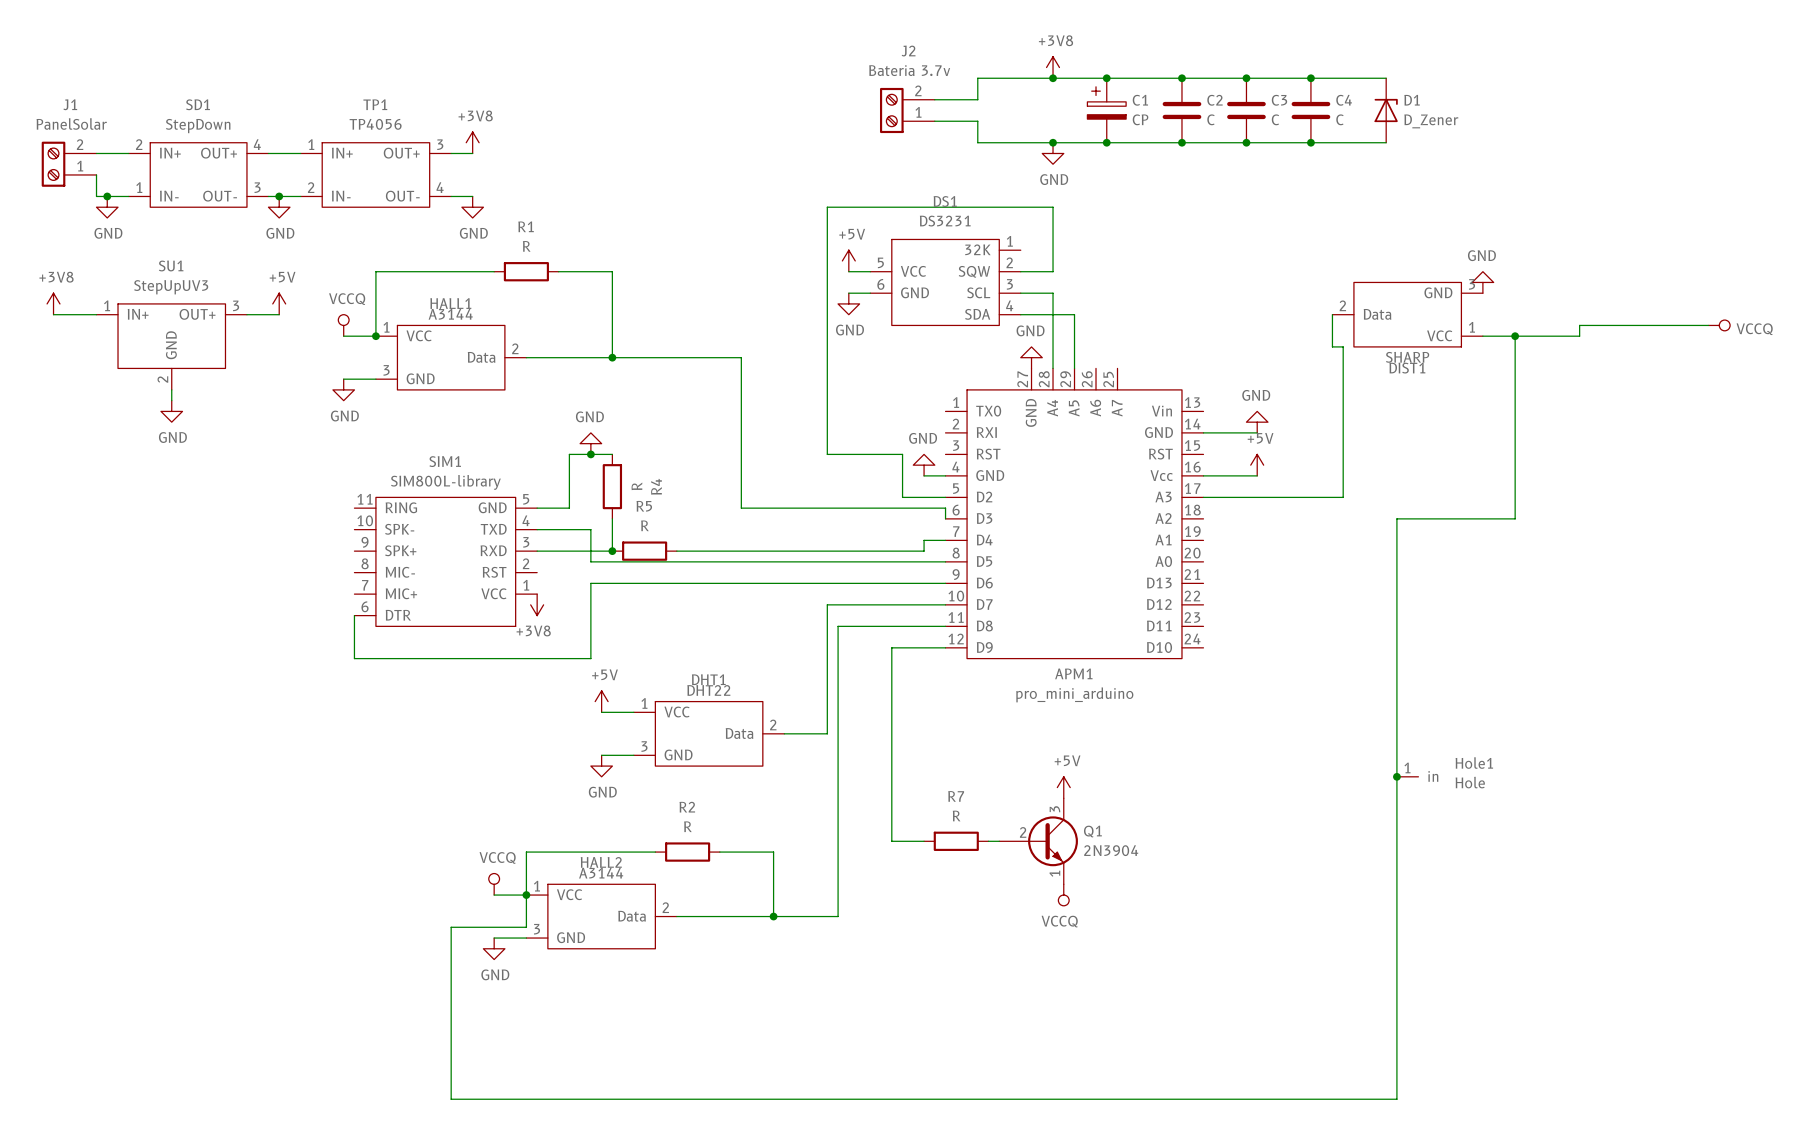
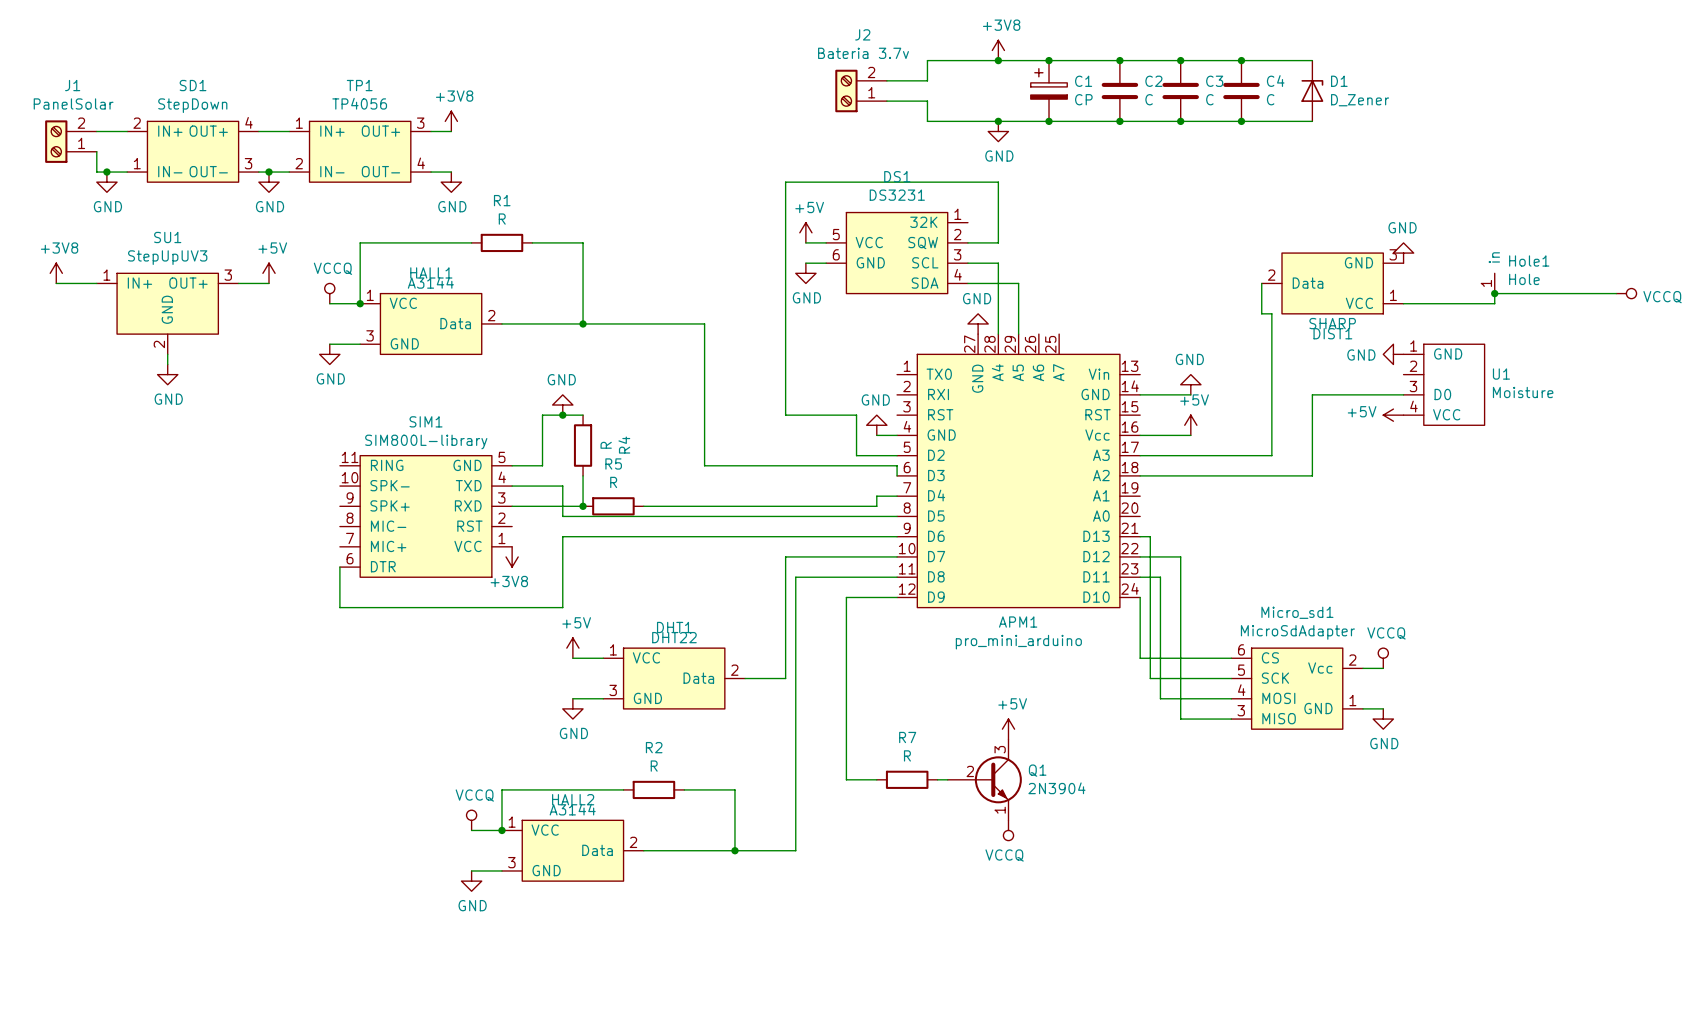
junction: none -> (1494, 293)
wire: (1515, 336) (1515, 518) (1396, 518) (1396, 1099) (451, 1099) (451, 927) (526, 927) (526, 895) -> none
junction: (1515, 336) -> none
power symbol: none -> GND (1393, 354)
U1: none -> Moisture (1444, 384)
wire: none -> (1403, 394) (1312, 394) (1312, 475) (1140, 475)
power symbol: none -> +5V (1393, 415)
wire: none -> (1140, 536) (1150, 536) (1150, 678) (1231, 678)
wire: none -> (1140, 556) (1180, 556) (1180, 719) (1231, 719)
wire: none -> (1140, 577) (1160, 577) (1160, 698) (1231, 698)
wire: none -> (1140, 597) (1140, 658) (1231, 658)
power symbol: none -> VCCQ (1383, 658)
wire: none -> (1363, 668) (1383, 668)
Micro_sd1: none -> MicroSdAdapter (1297, 688)
Hole1 name position: Hole1 (1474, 763) -> Hole1 (1529, 260)
wire: none -> (1363, 708) (1383, 708)
junction: (1396, 776) -> none
Hole1 rotation: 0° (1407, 776) -> 90° counterclockwise (1494, 283)
Hole1 position: (1407, 776) -> (1494, 283)
power symbol: none -> GND (1383, 719)
Hole1 value position: Hole (1470, 782) -> Hole (1524, 279)

